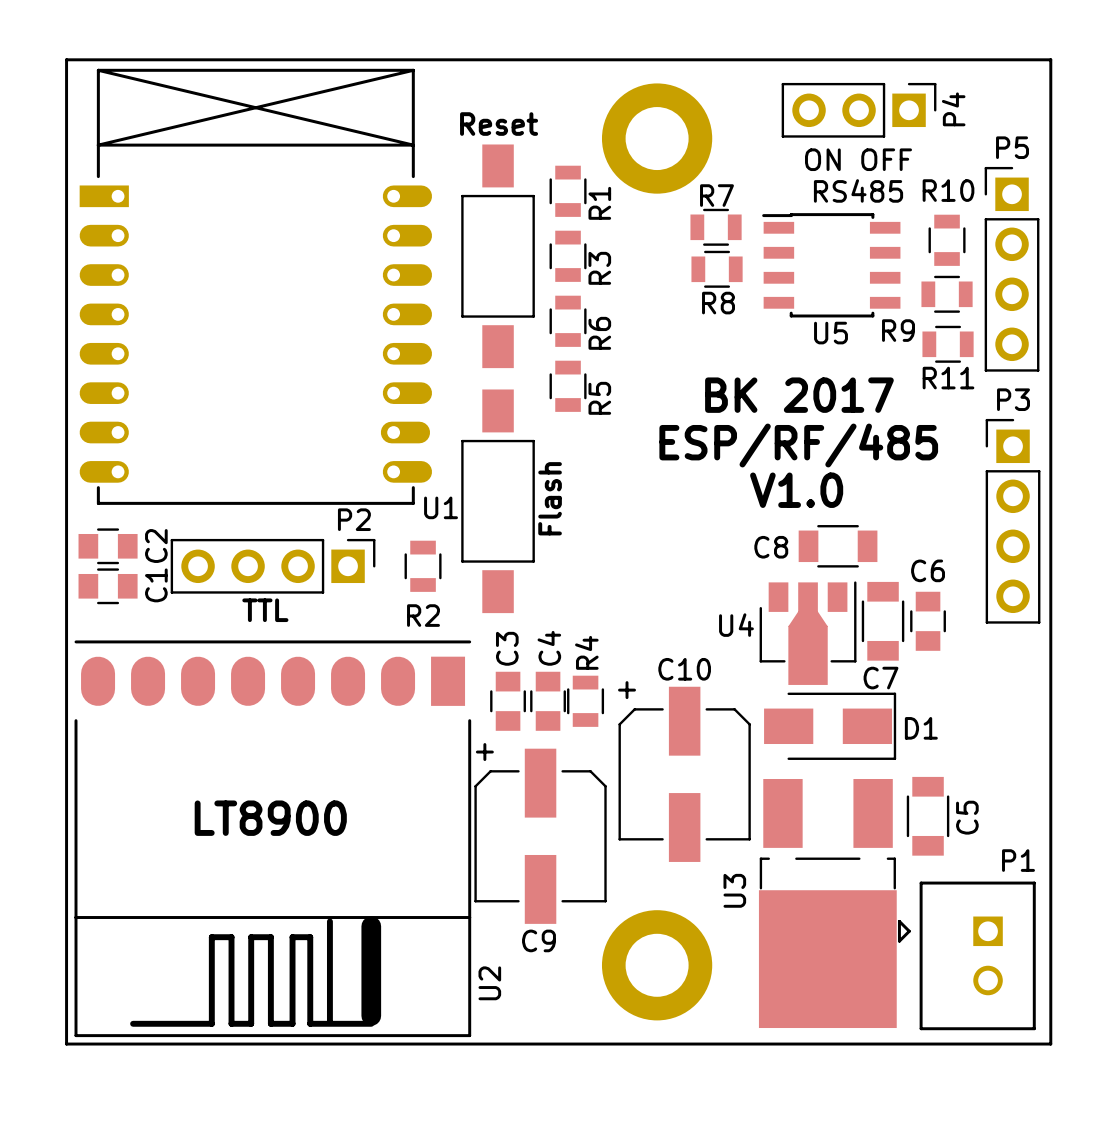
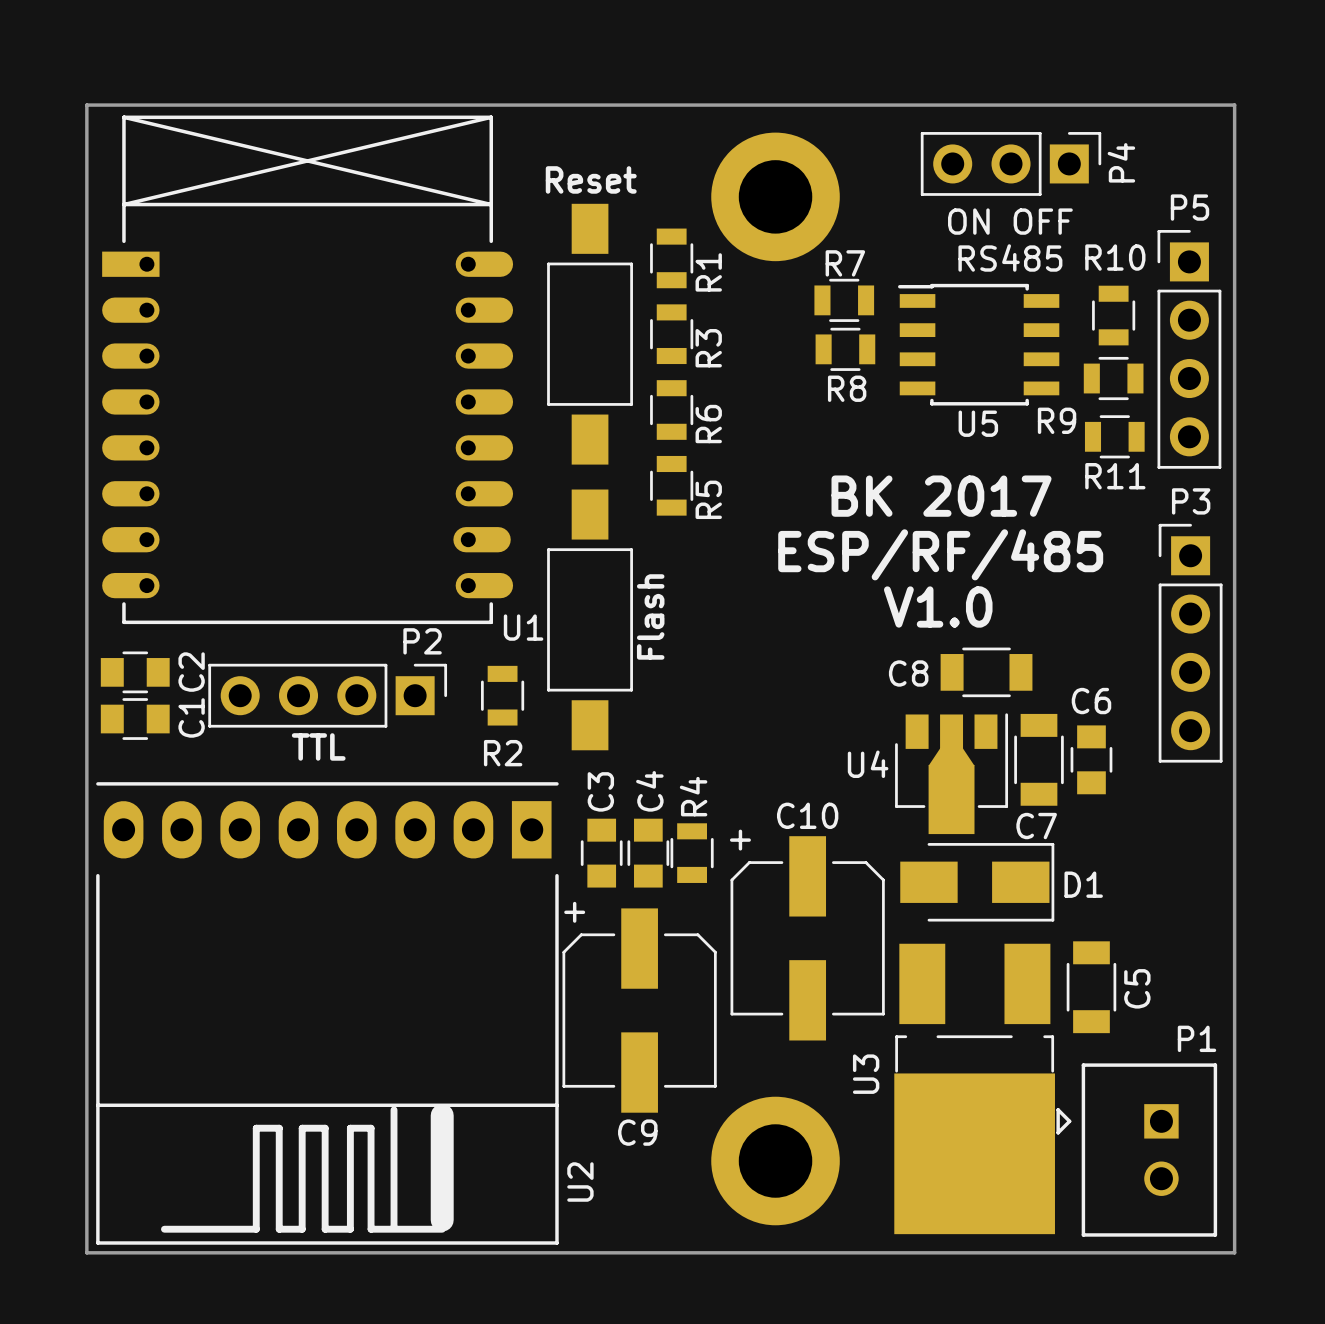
U2 footprint: [74, 640, 472, 1038] -> [96, 782, 559, 1245]
text: LT8900 (270, 818) -> none

